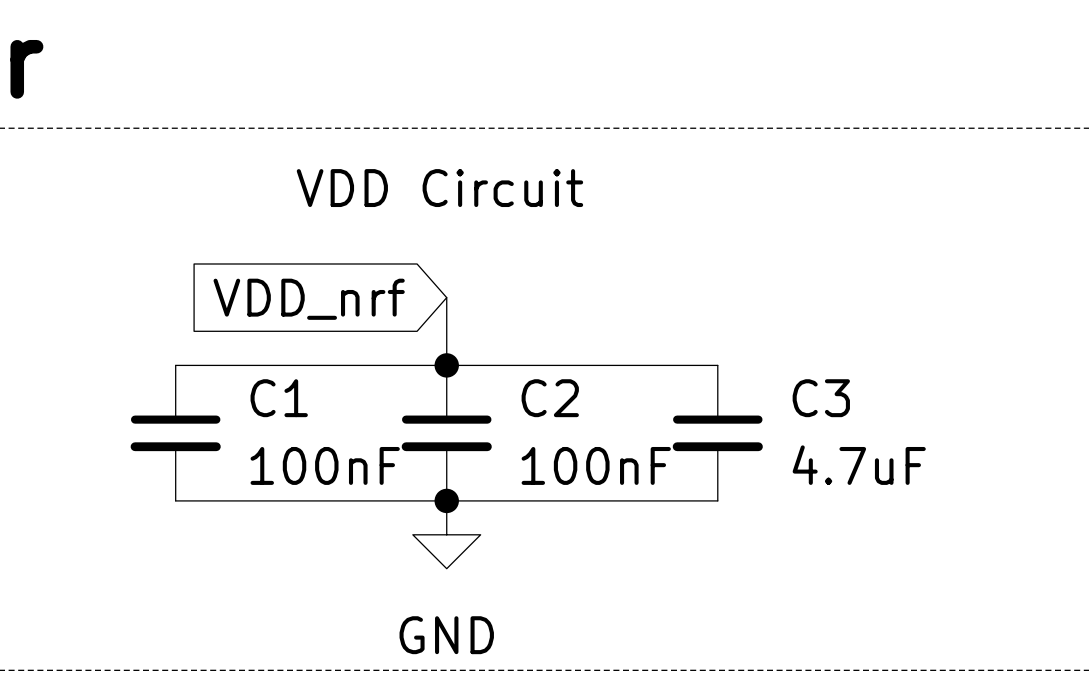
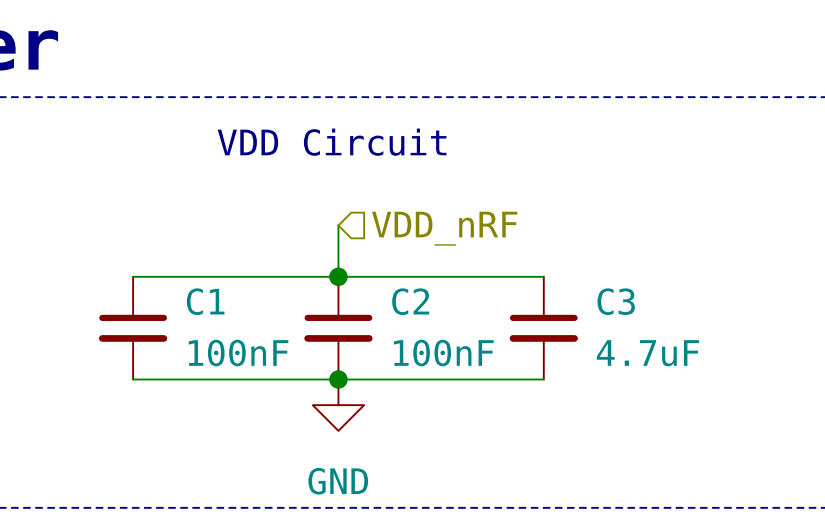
hierarchical label: none -> VDD_nRF (444, 228)
global label: VDD_nrf (309, 299) -> none

